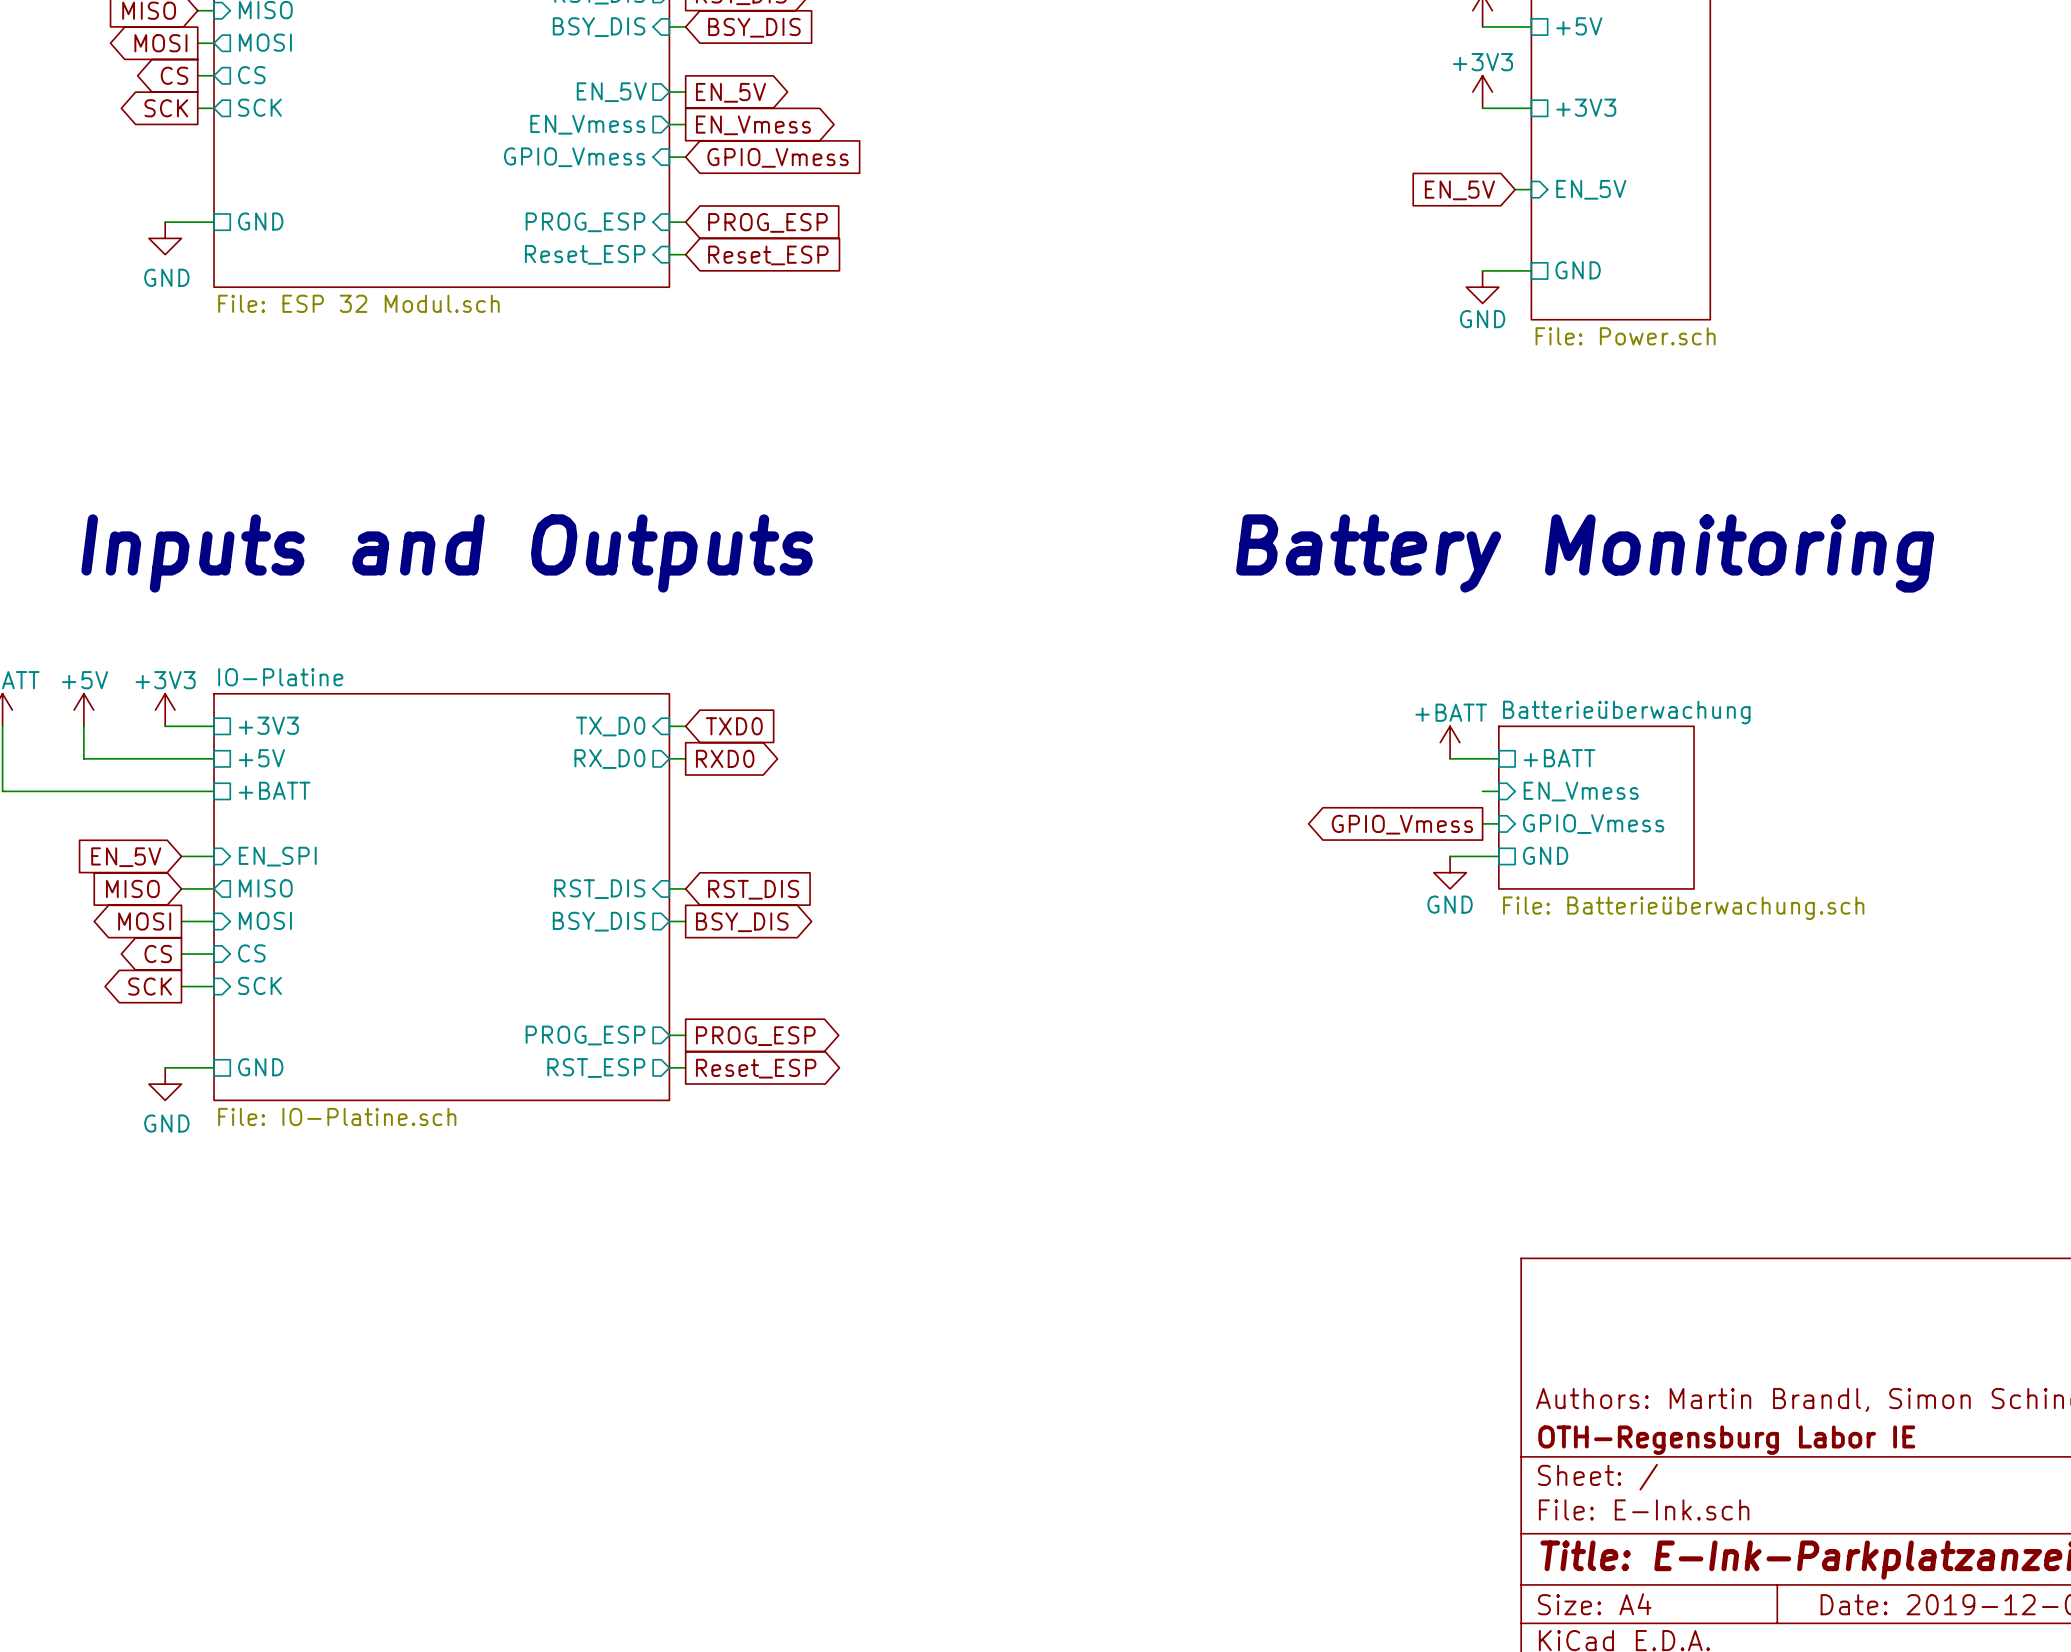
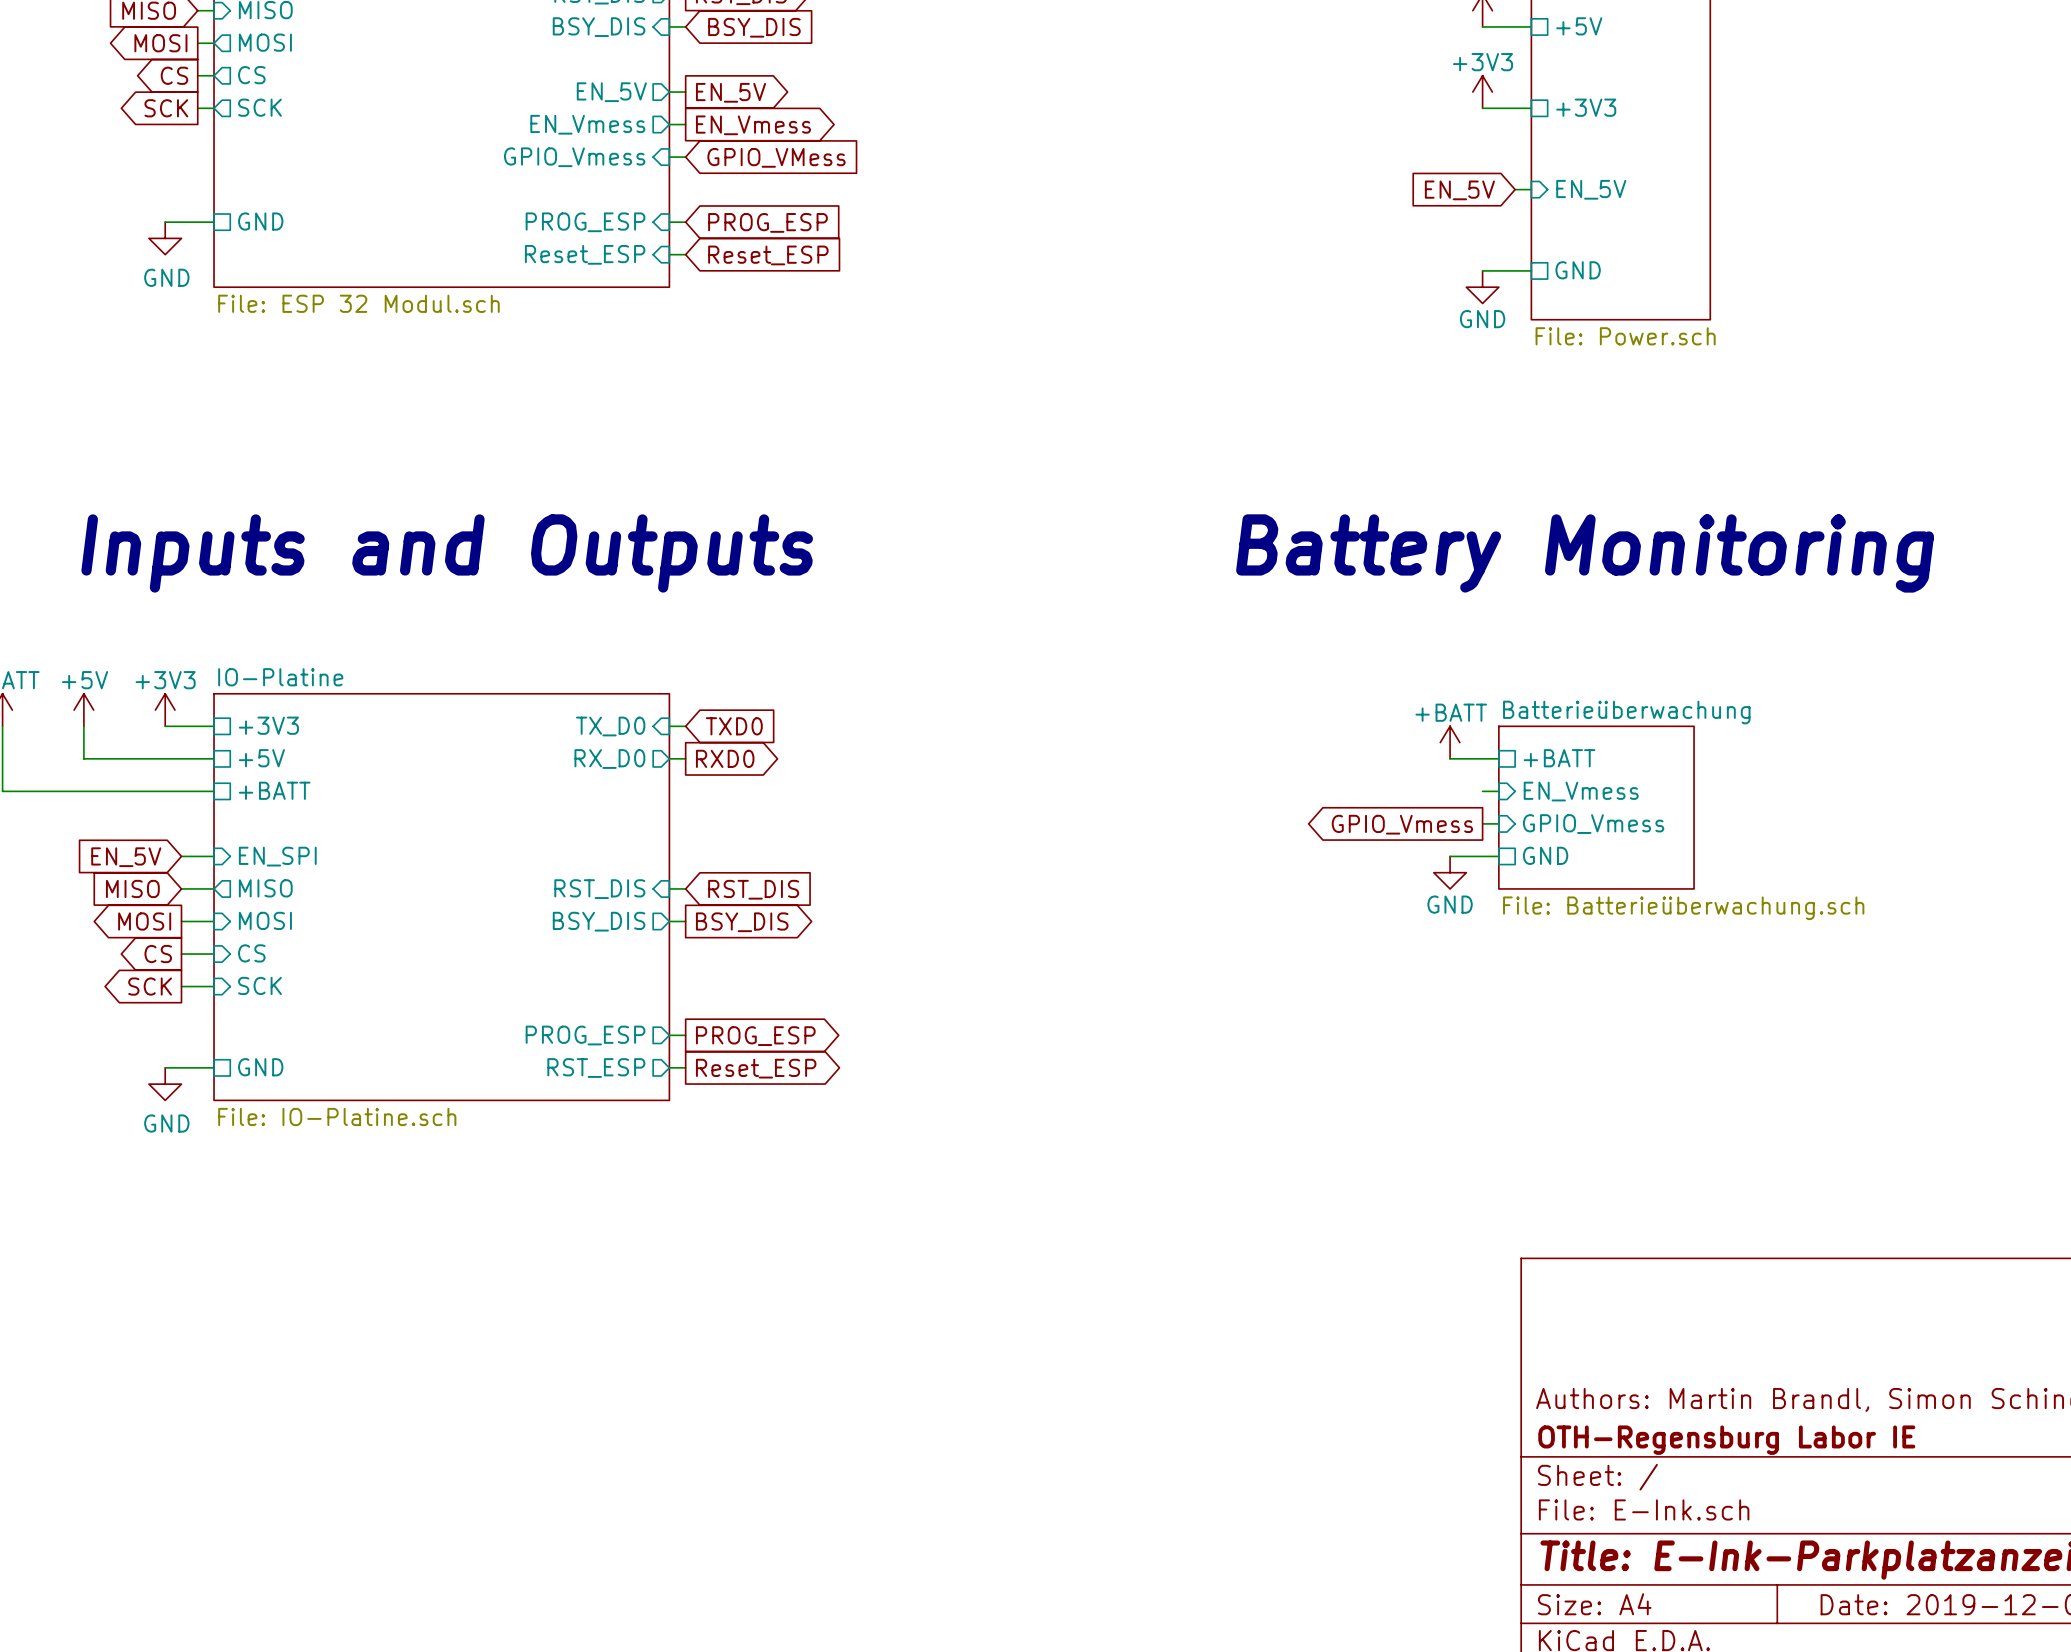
global label: GPIO_Vmess (778, 157) -> GPIO_VMess (776, 157)

